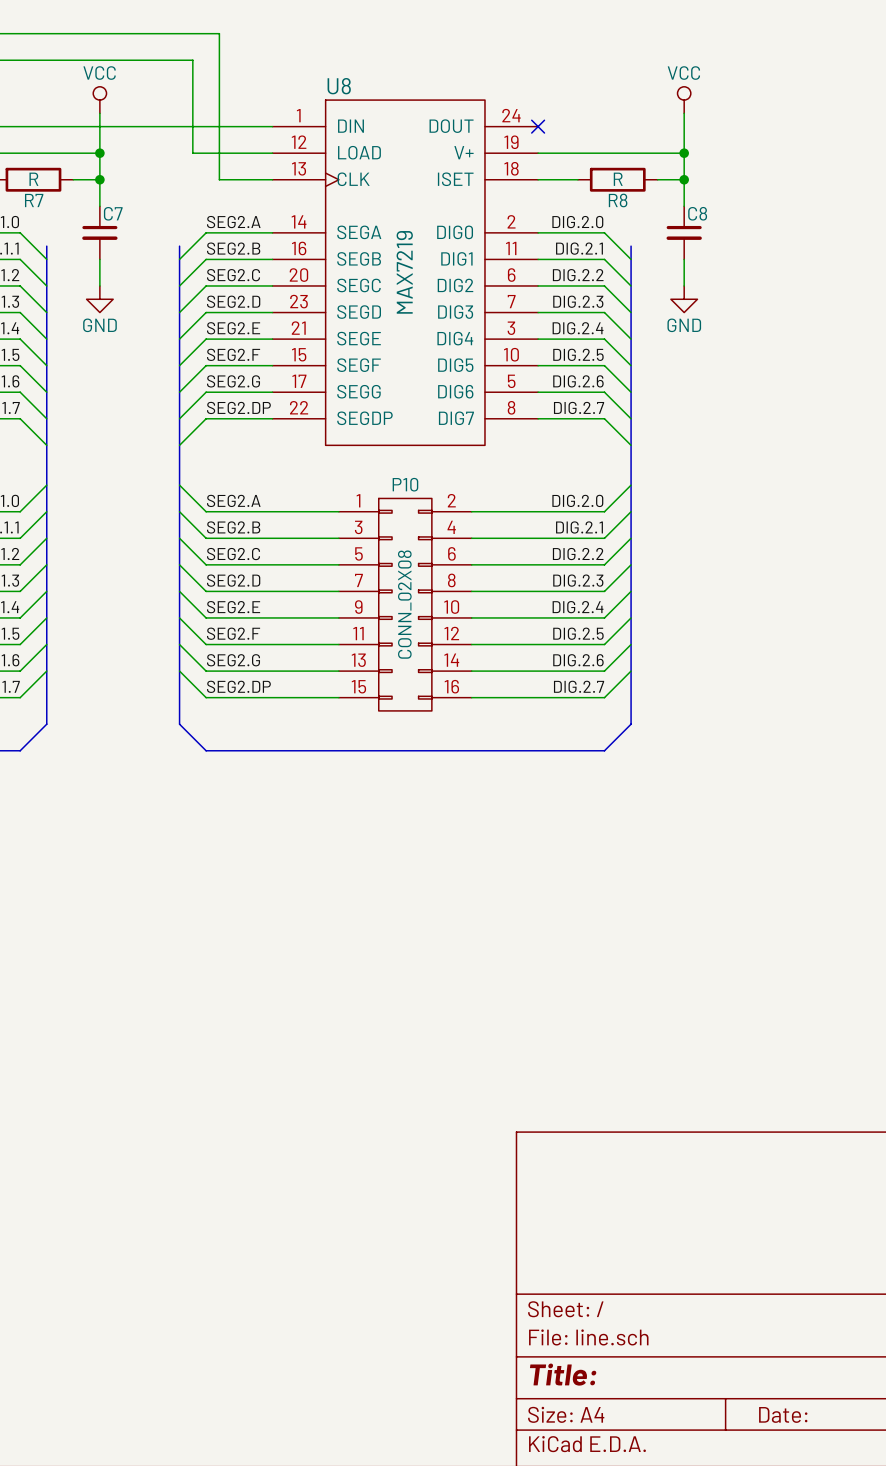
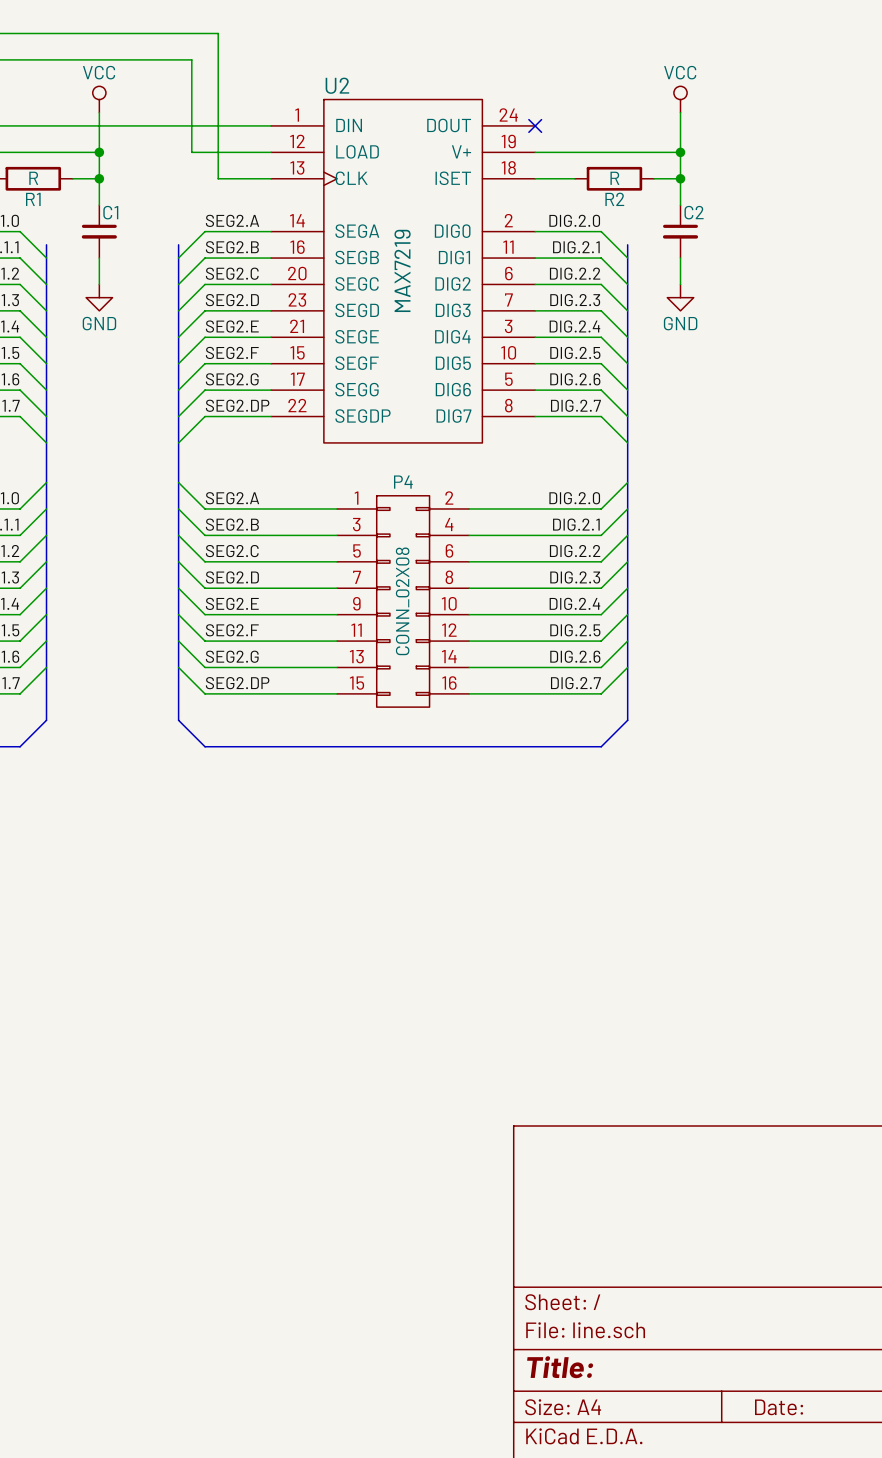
U8 name: U8 (339, 86) -> U2 (337, 85)
R7 name: R7 (34, 200) -> R1 (33, 199)
R8 name: R8 (618, 200) -> R2 (614, 199)
C7 name: C7 (113, 213) -> C1 (110, 212)
C8 name: C8 (697, 213) -> C2 (694, 212)
P10 name: P10 (405, 484) -> P4 (403, 482)

